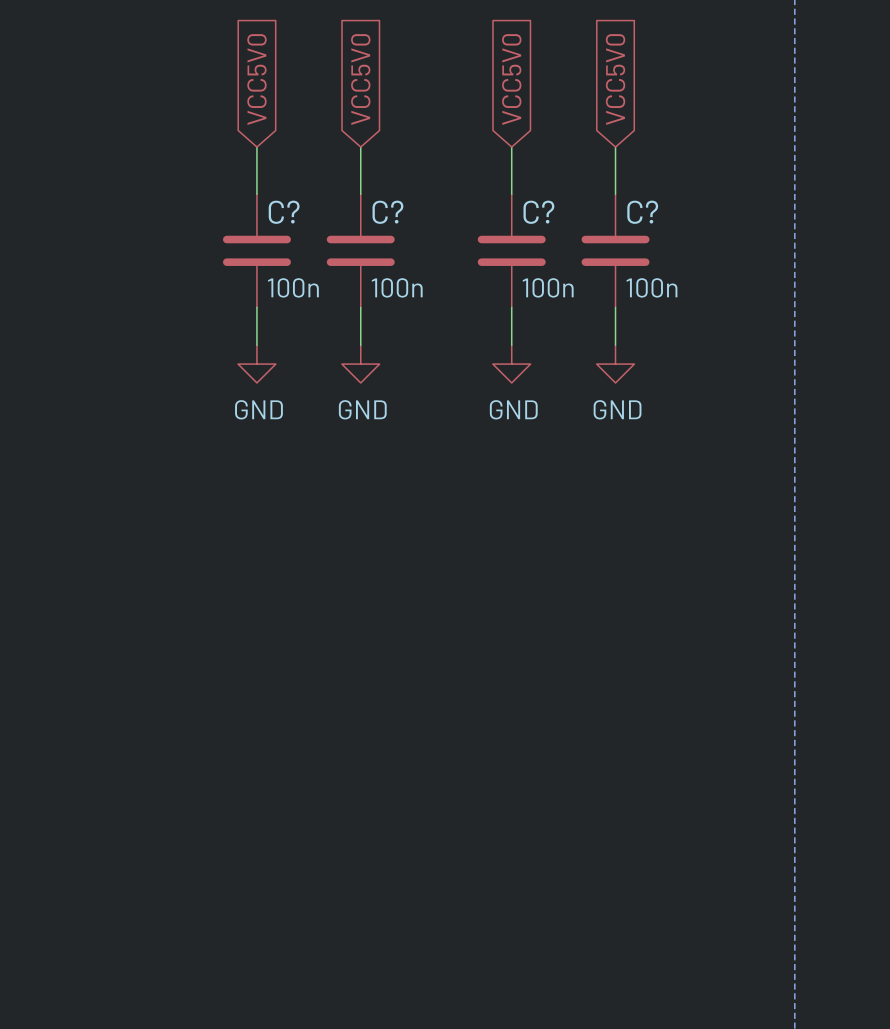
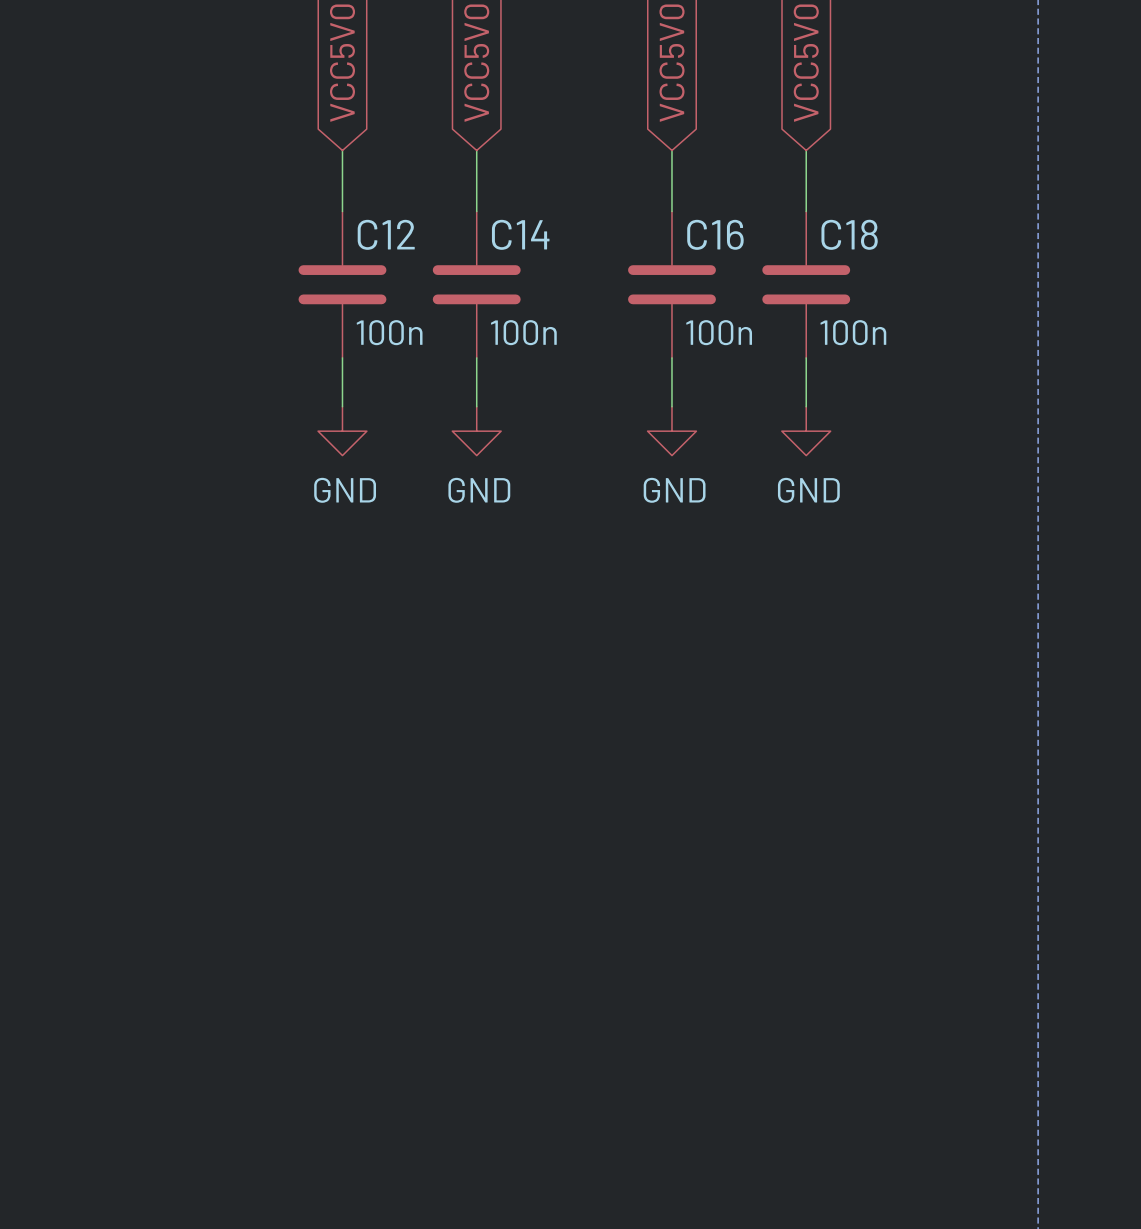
C? name: C? (284, 212) -> C12 (386, 234)
C? name: C? (387, 212) -> C14 (520, 234)
C? name: C? (538, 212) -> C16 (715, 234)
C? name: C? (642, 212) -> C18 (849, 234)

